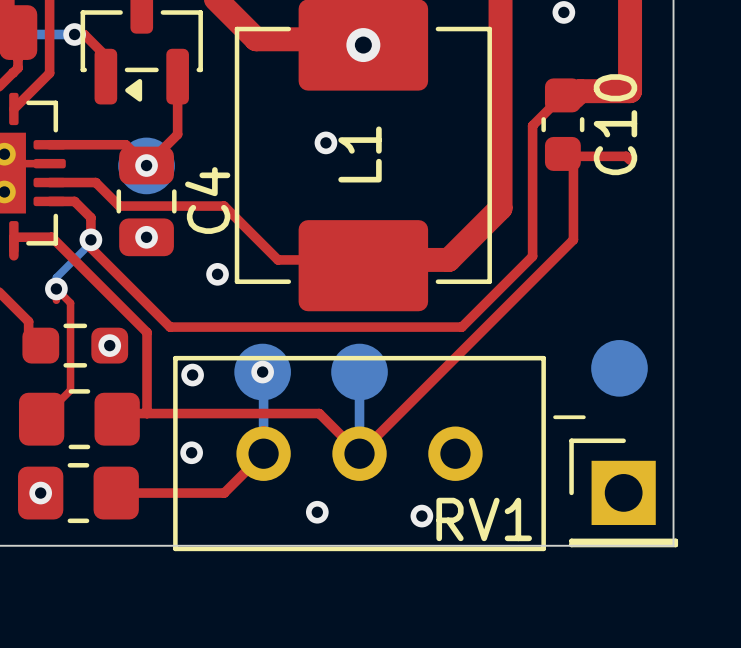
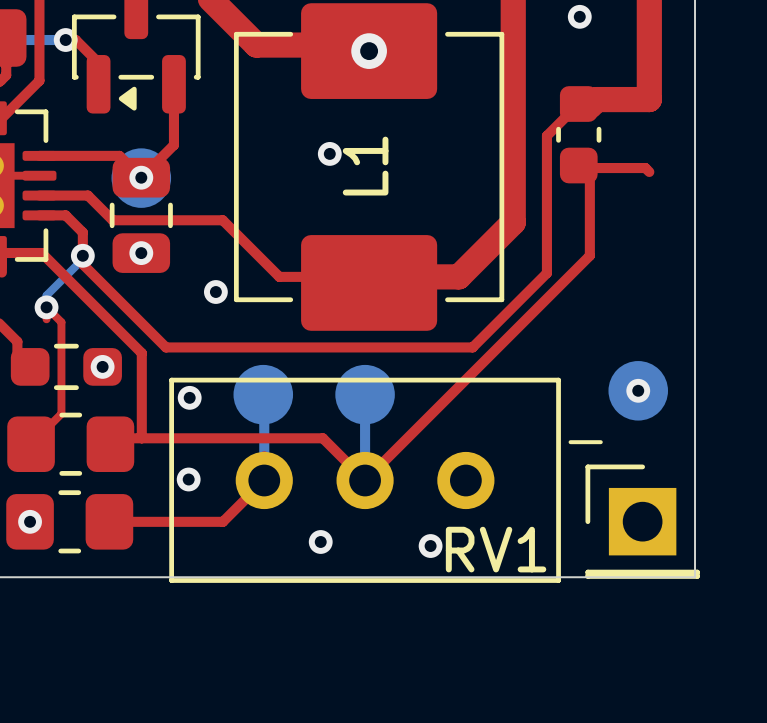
C10 name: C10 (615, 124) -> none
C4 name: C4 (207, 200) -> none
via: none -> (638, 390)
via: (262, 372) -> none

